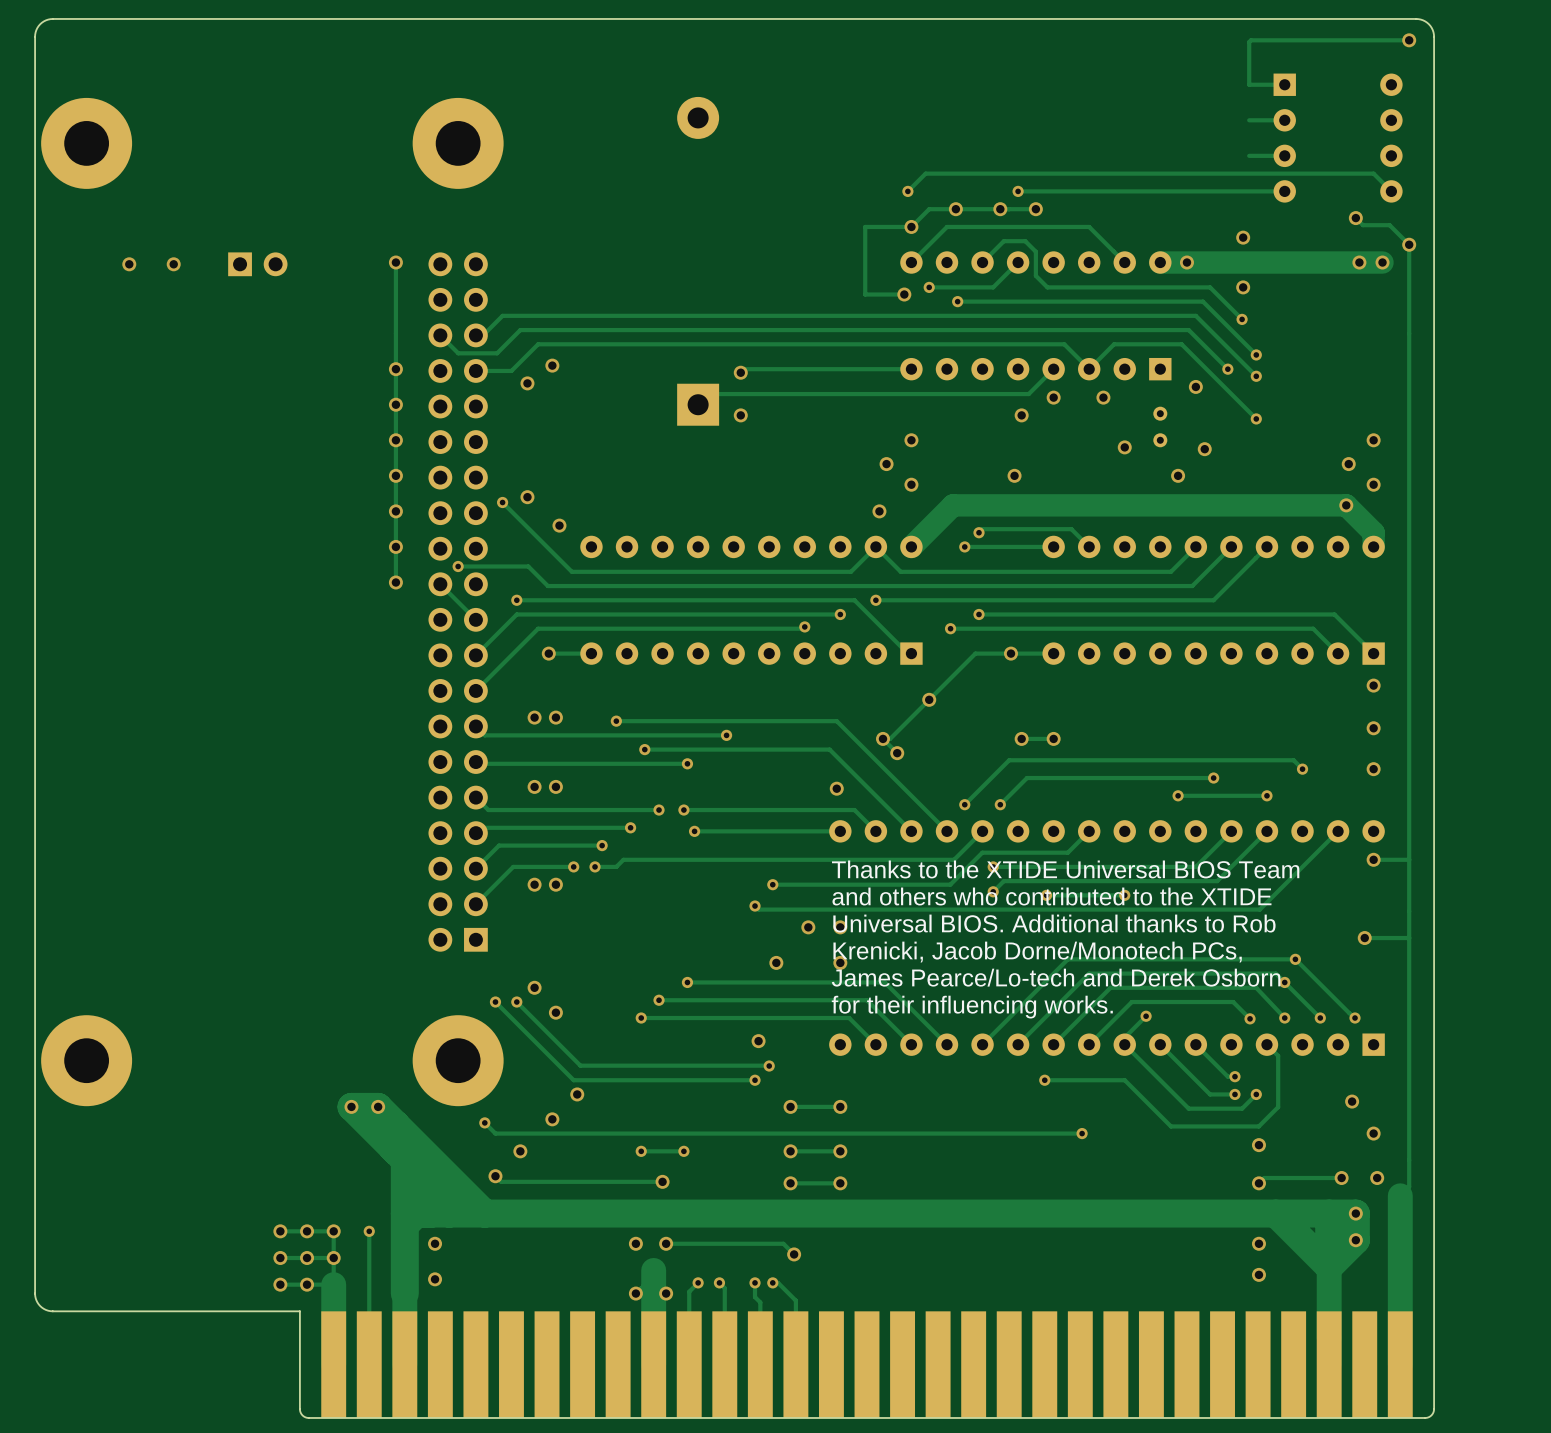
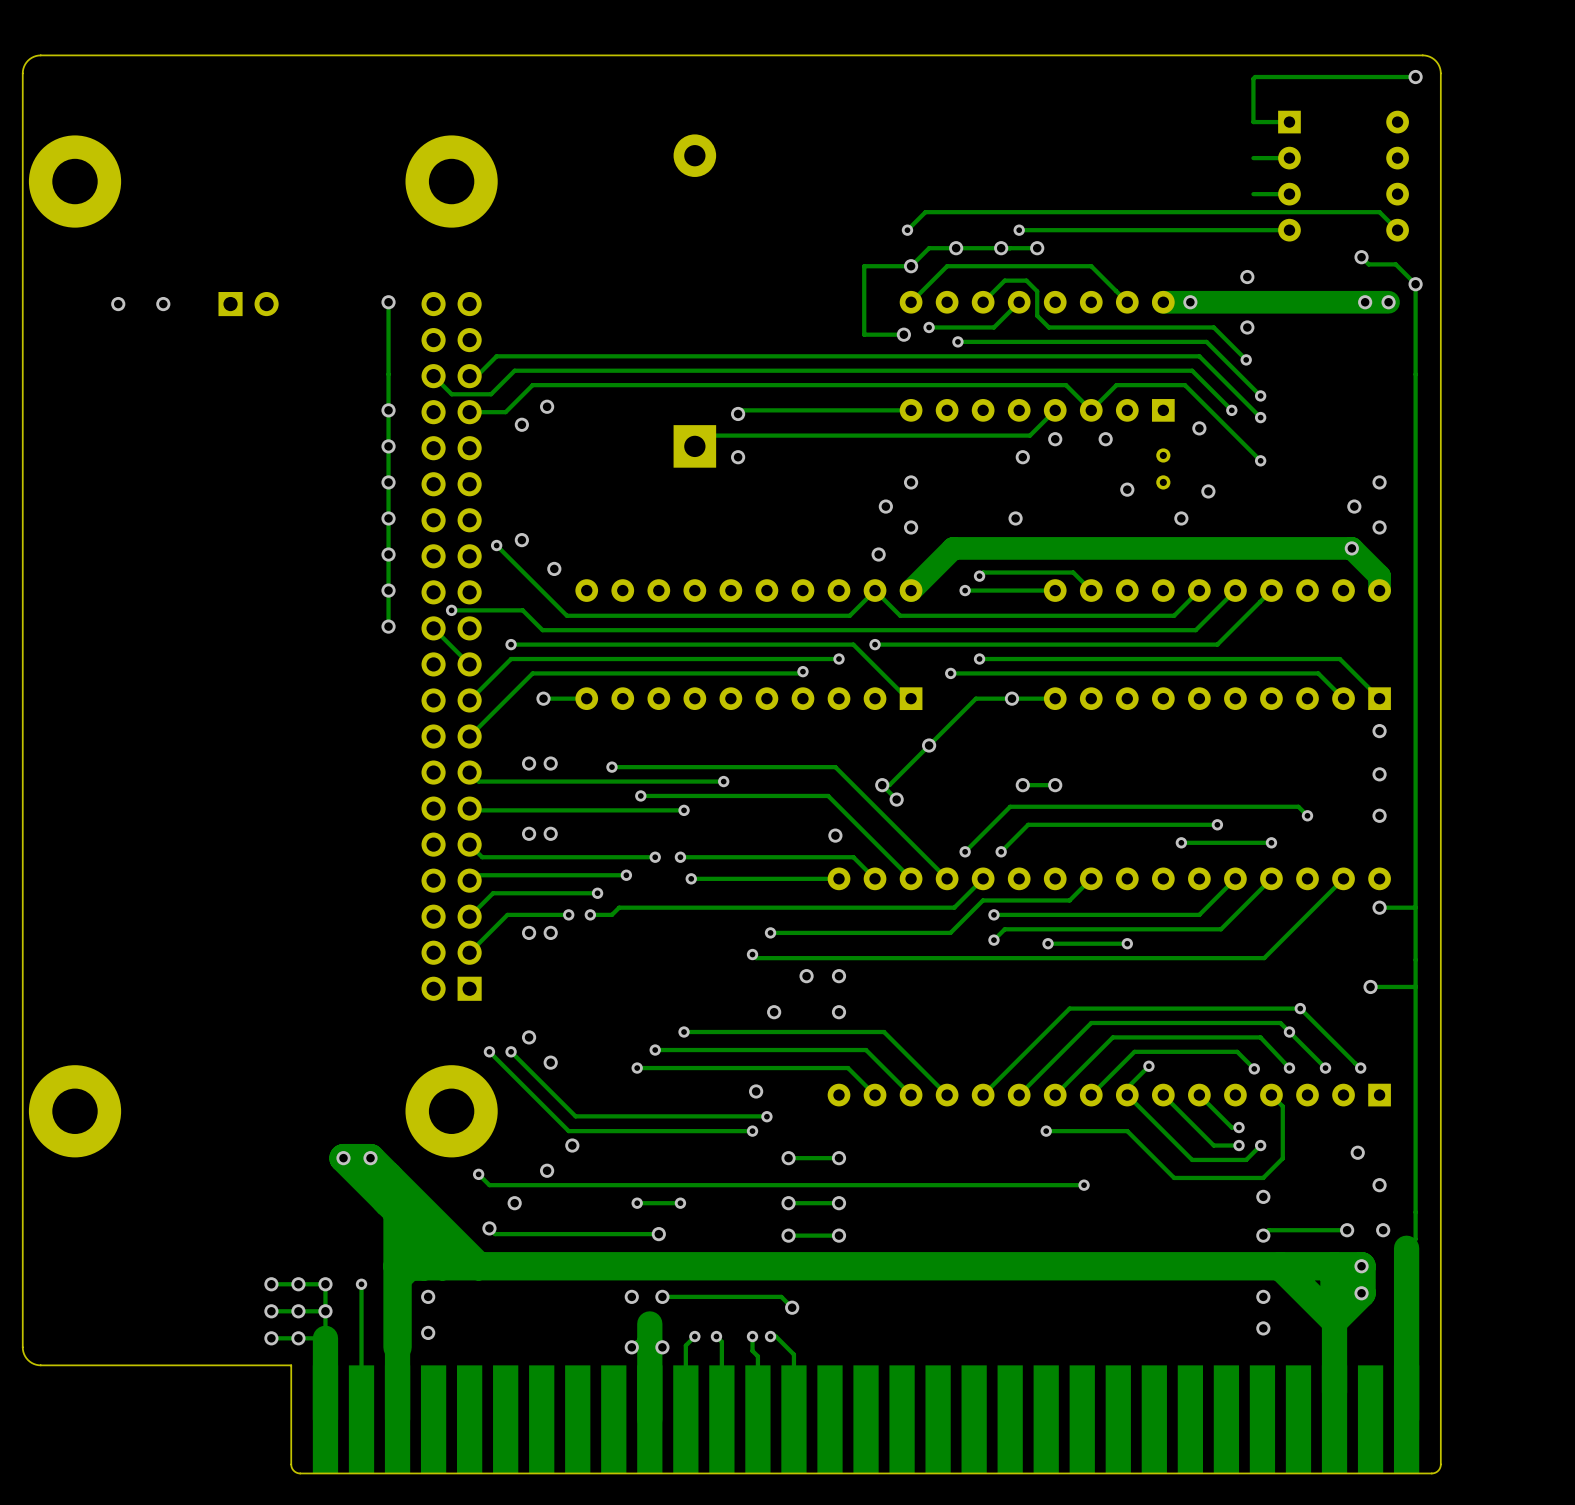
text: Thanks to the XTIDE Universal BIOS Team (1065, 869) -> none
text: and others who contributed to the XTIDE (1051, 896) -> none
text: Universal BIOS. Additional thanks to Rob (1054, 923) -> none
text: Krenicki, Jacob Dorne/Monotech PCs, (1037, 952) -> none
text: James Pearce/Lo-tech and Derek Osborn (1056, 977) -> none
text: for their influencing works. (972, 1007) -> none

